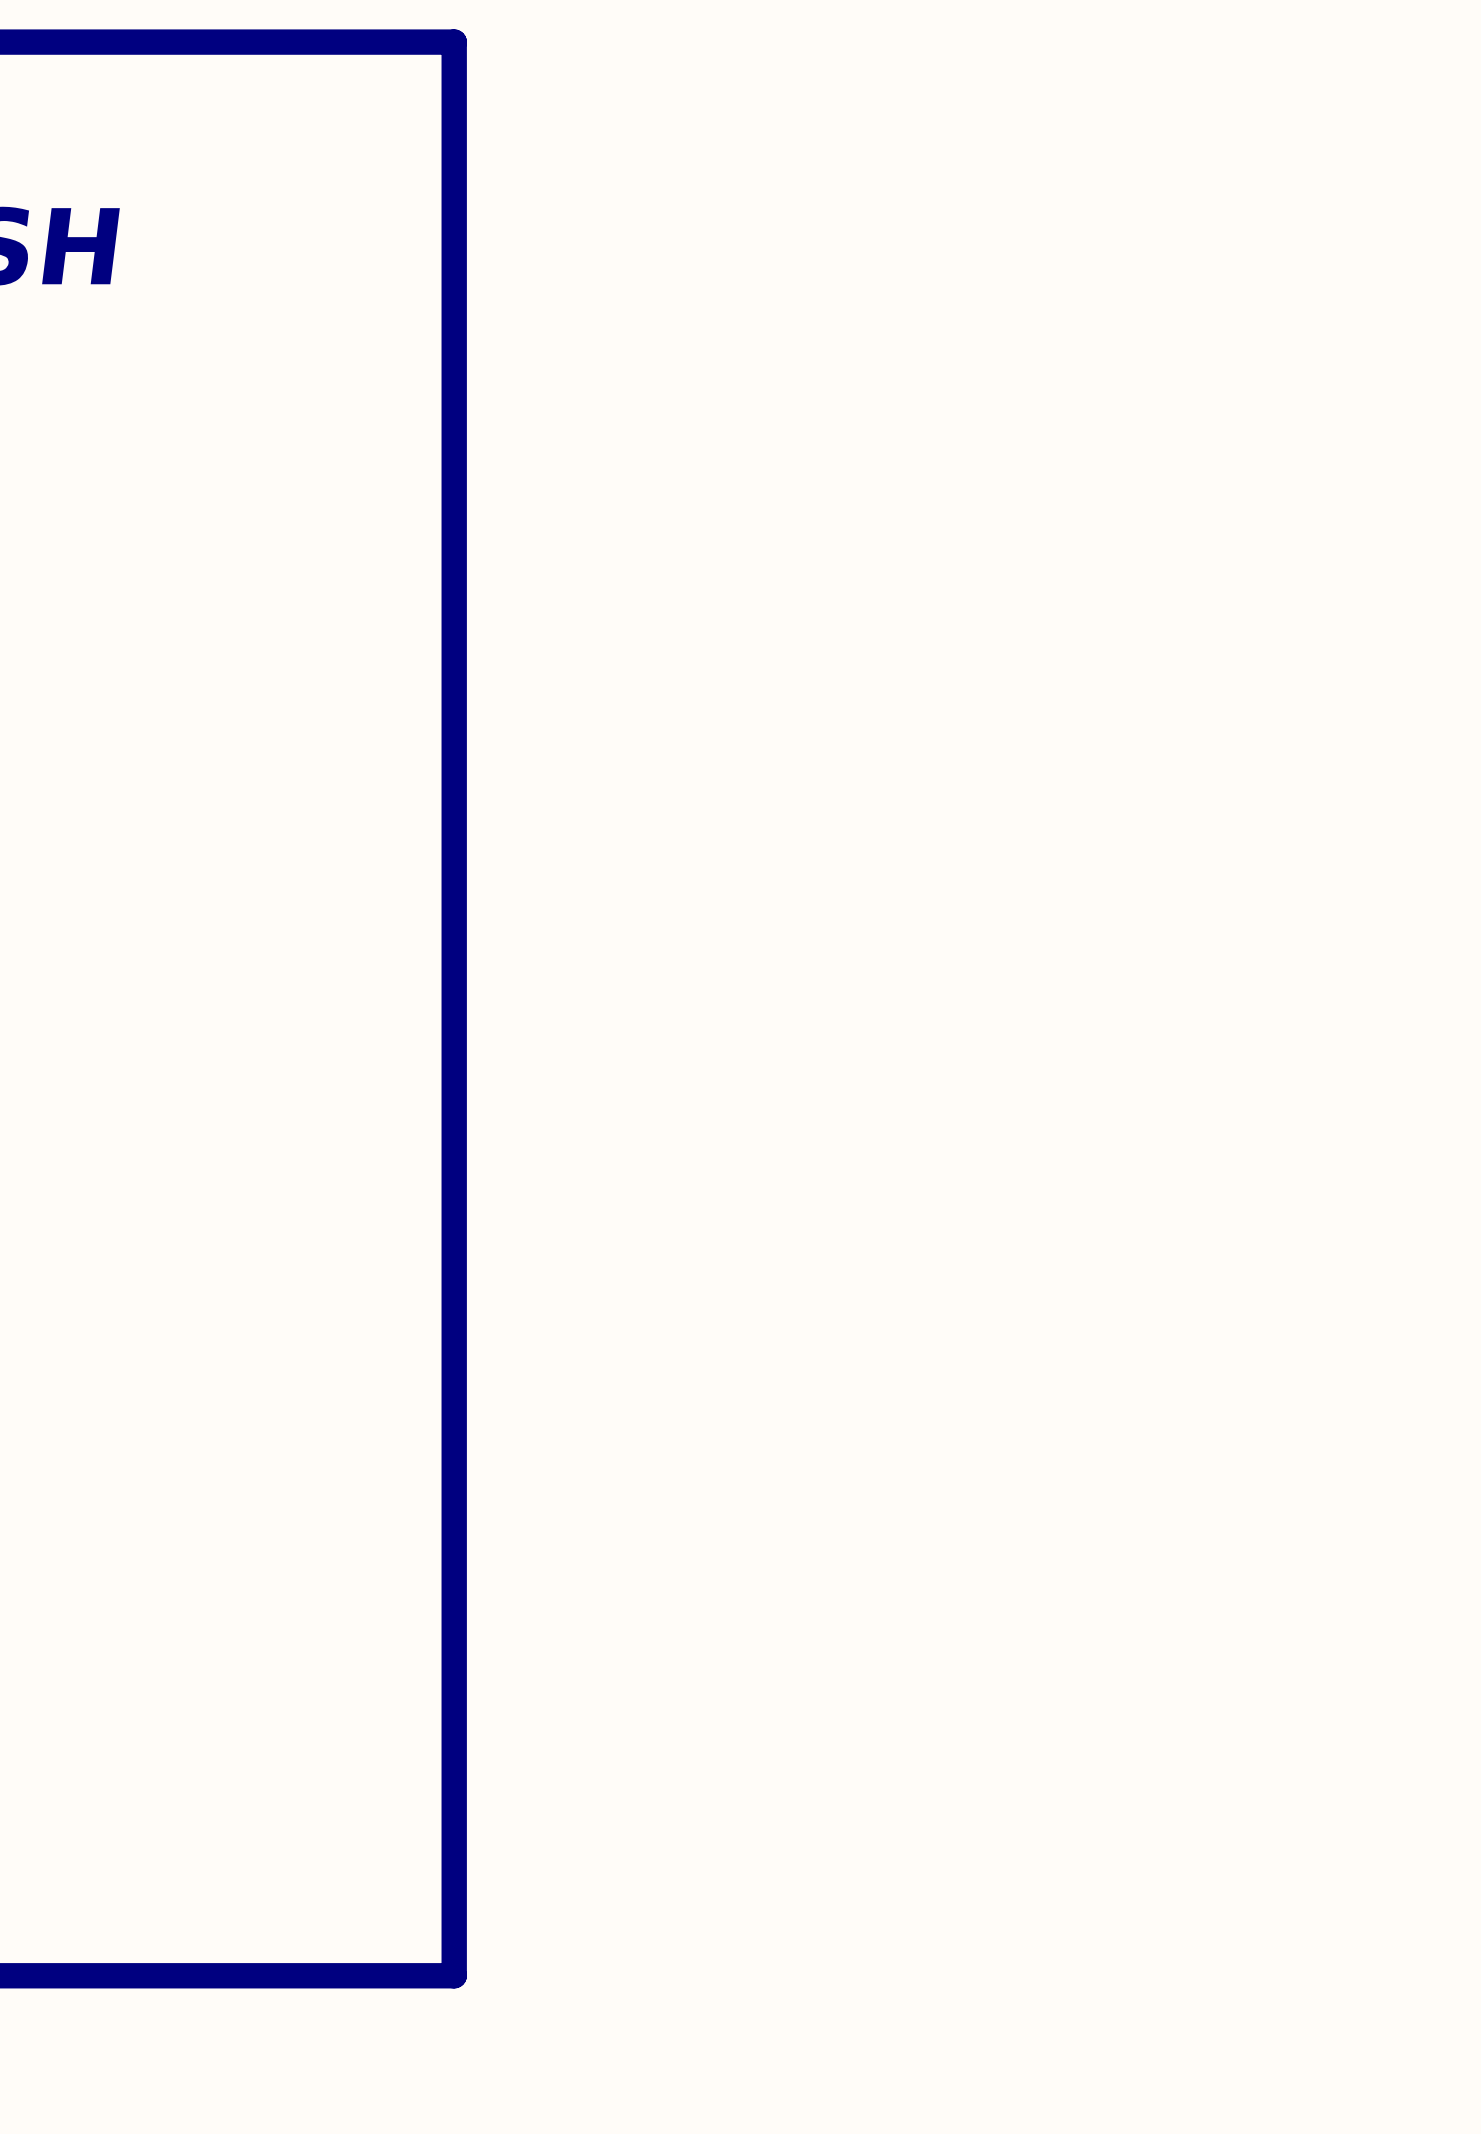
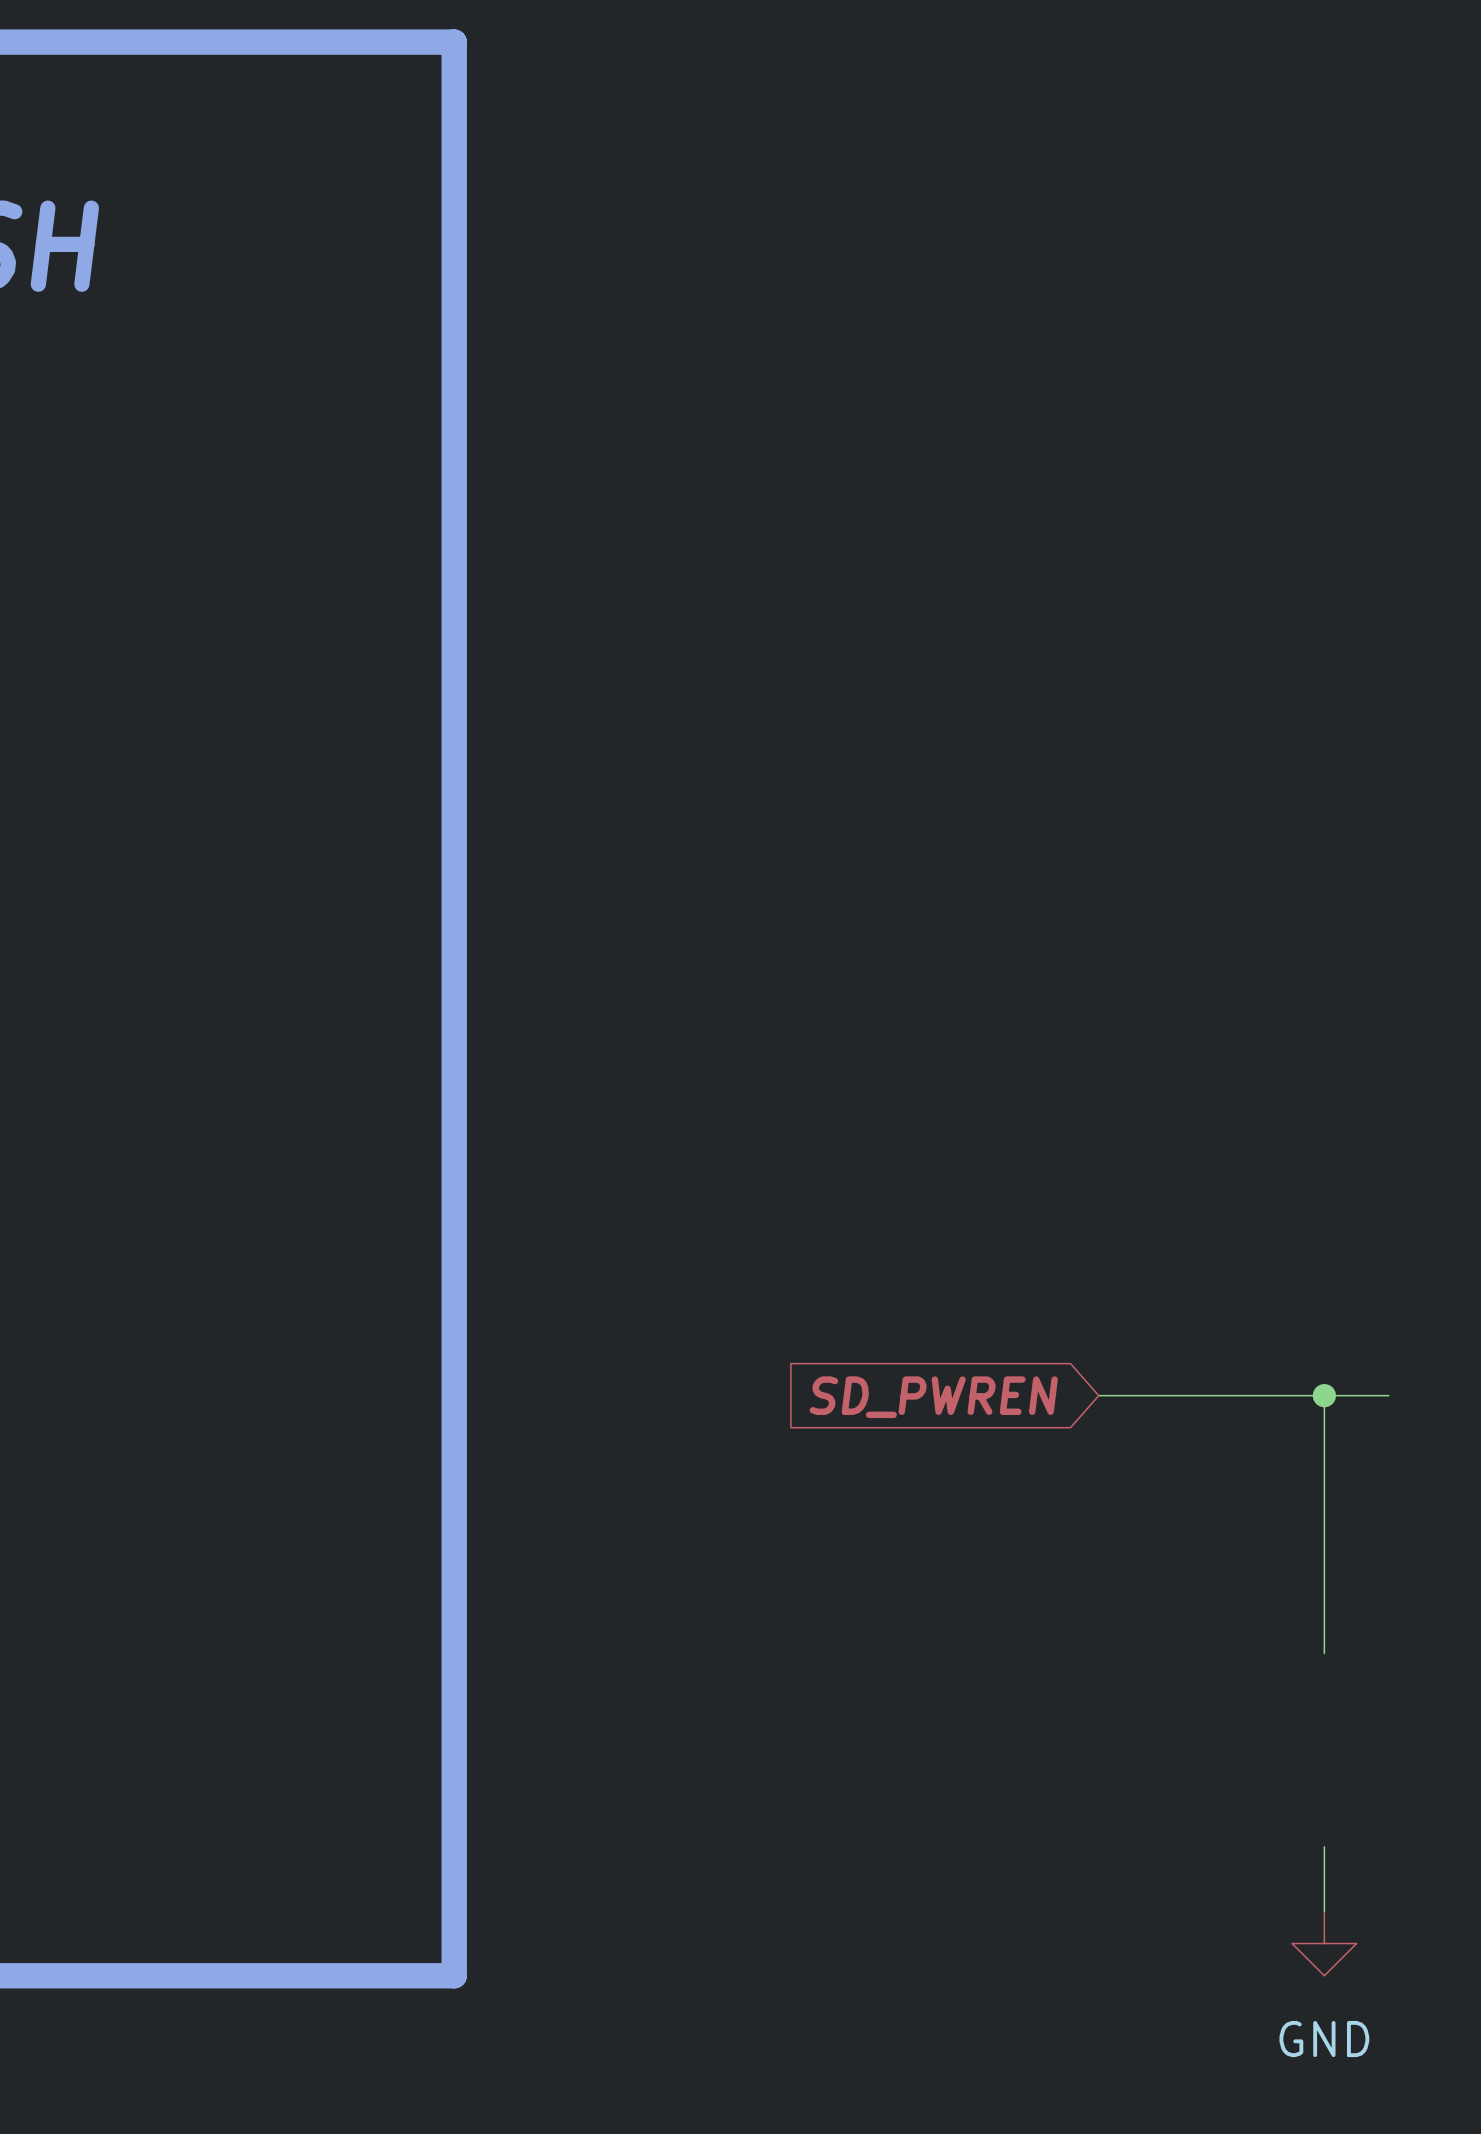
wire: none -> (1098, 1395) (1388, 1395)
wire: none -> (1324, 1395) (1324, 1653)
junction: none -> (1324, 1395)
global label: none -> SD_PWREN (933, 1397)
wire: none -> (1324, 1846) (1324, 1911)
power symbol: none -> GND (1324, 1943)

